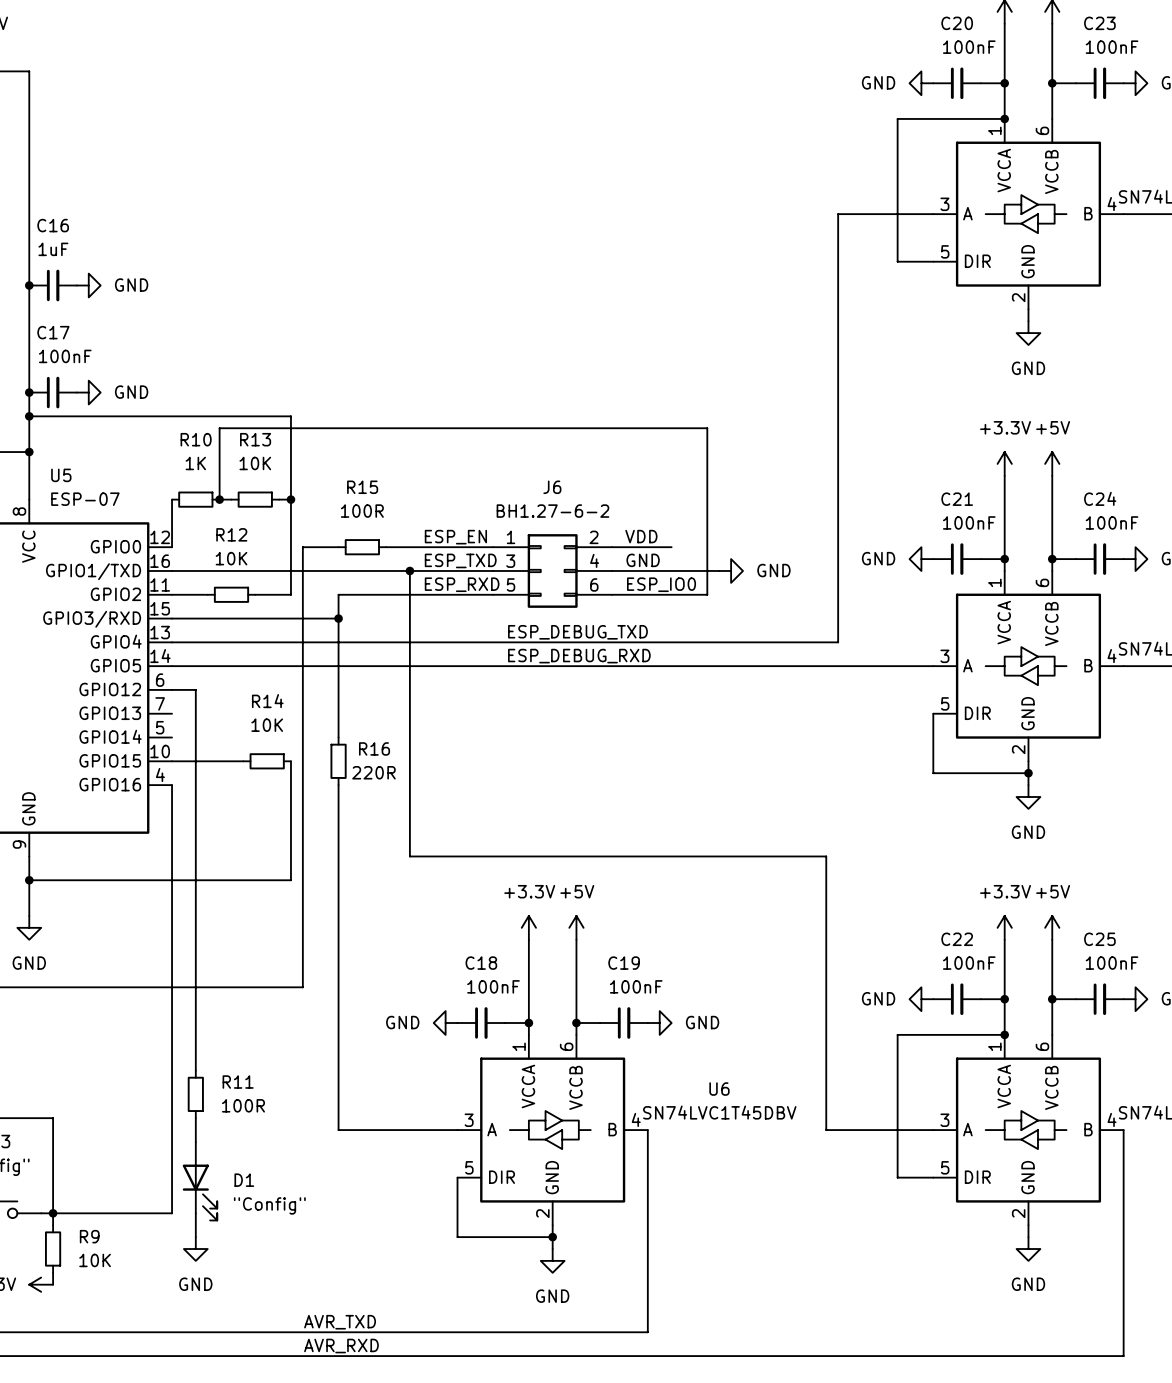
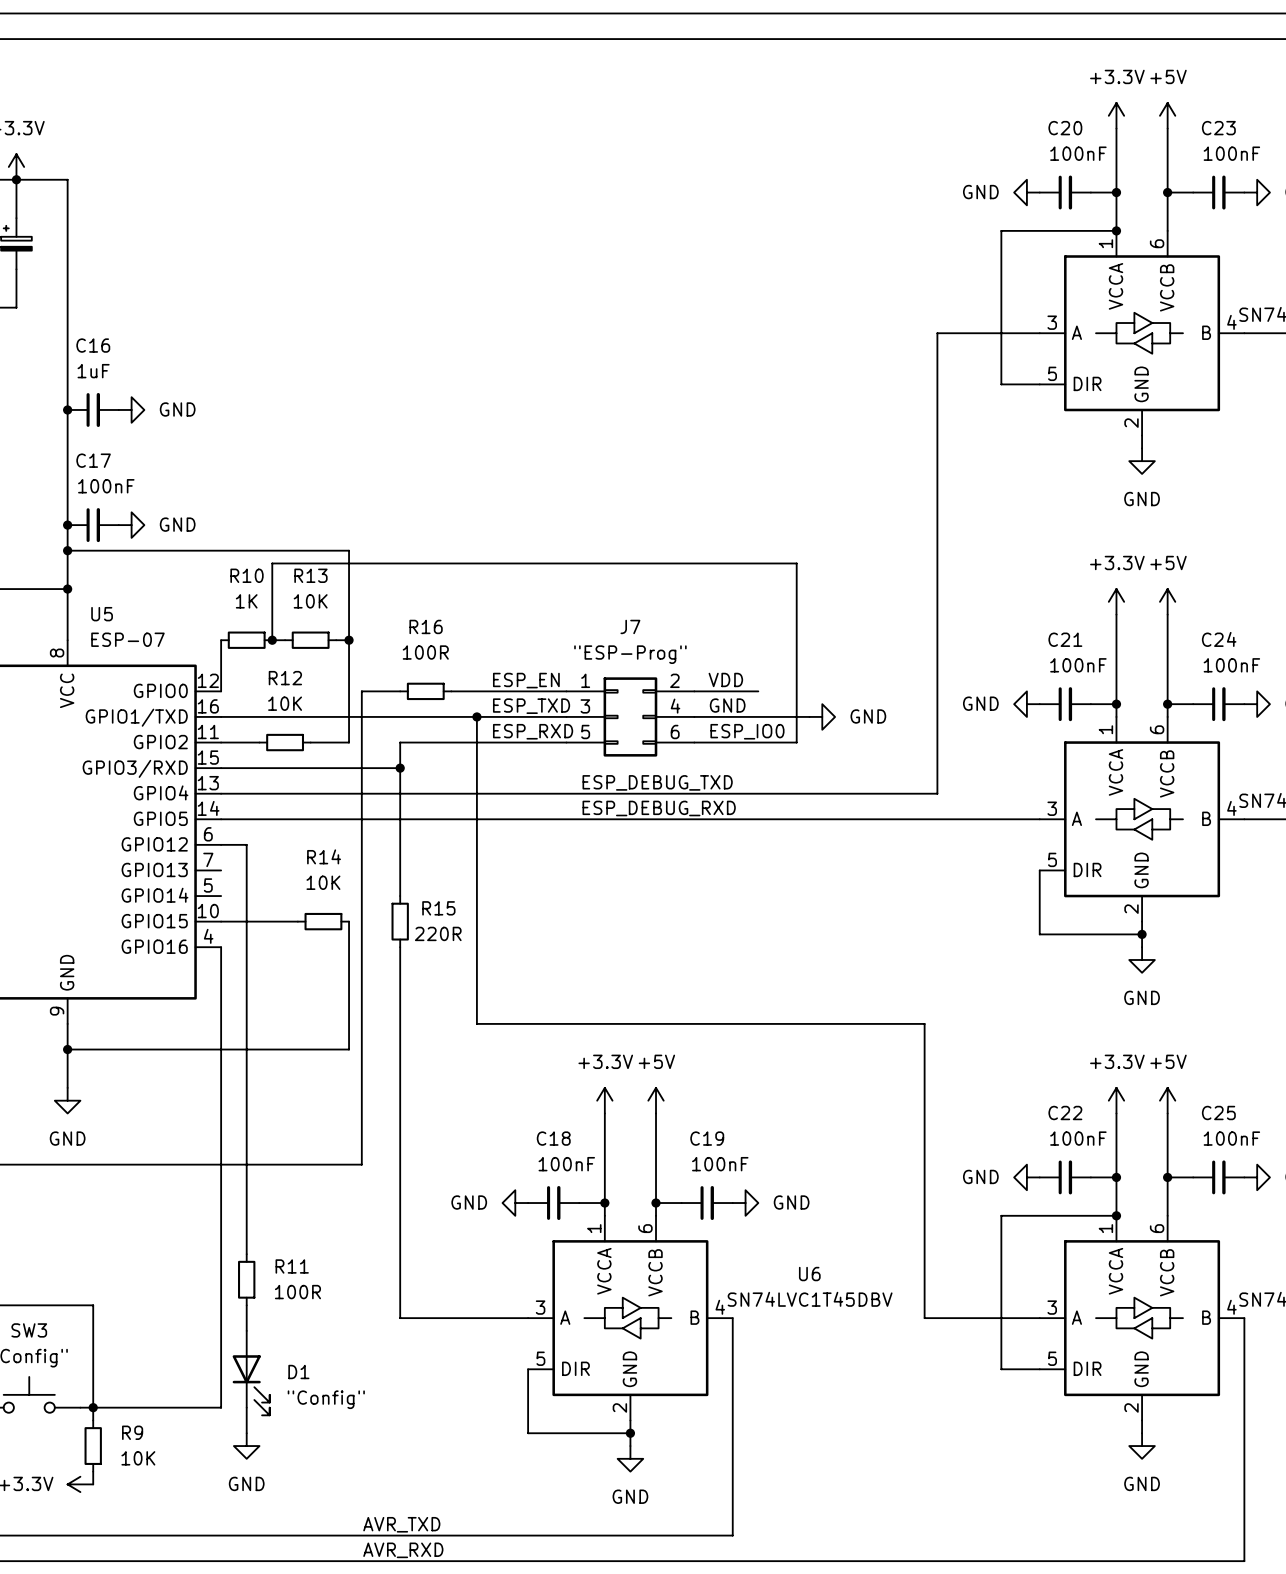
R15 name: R15 (362, 487) -> R16 (426, 626)
J6 name: J6 (552, 487) -> J7 (630, 626)
J6 value: BH1.27-6-2 (552, 511) -> "ESP-Prog" (630, 654)
R16 name: R16 (374, 748) -> R15 (438, 908)

